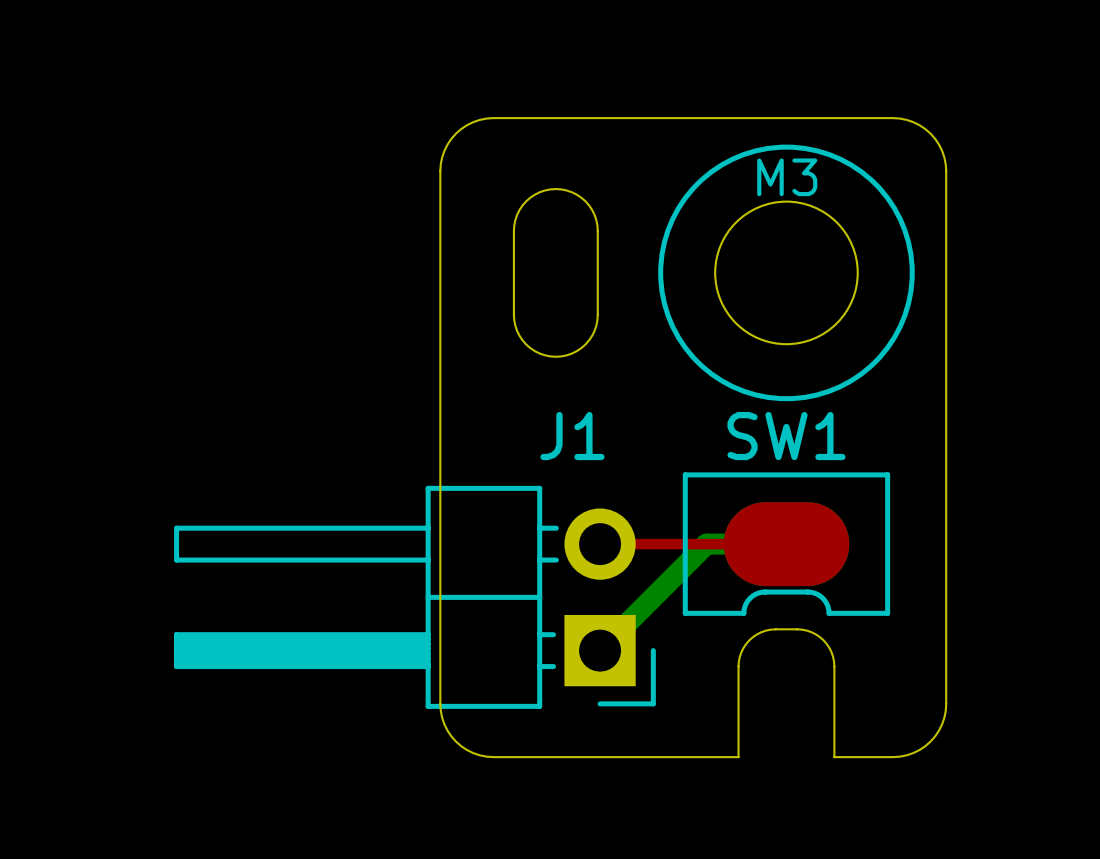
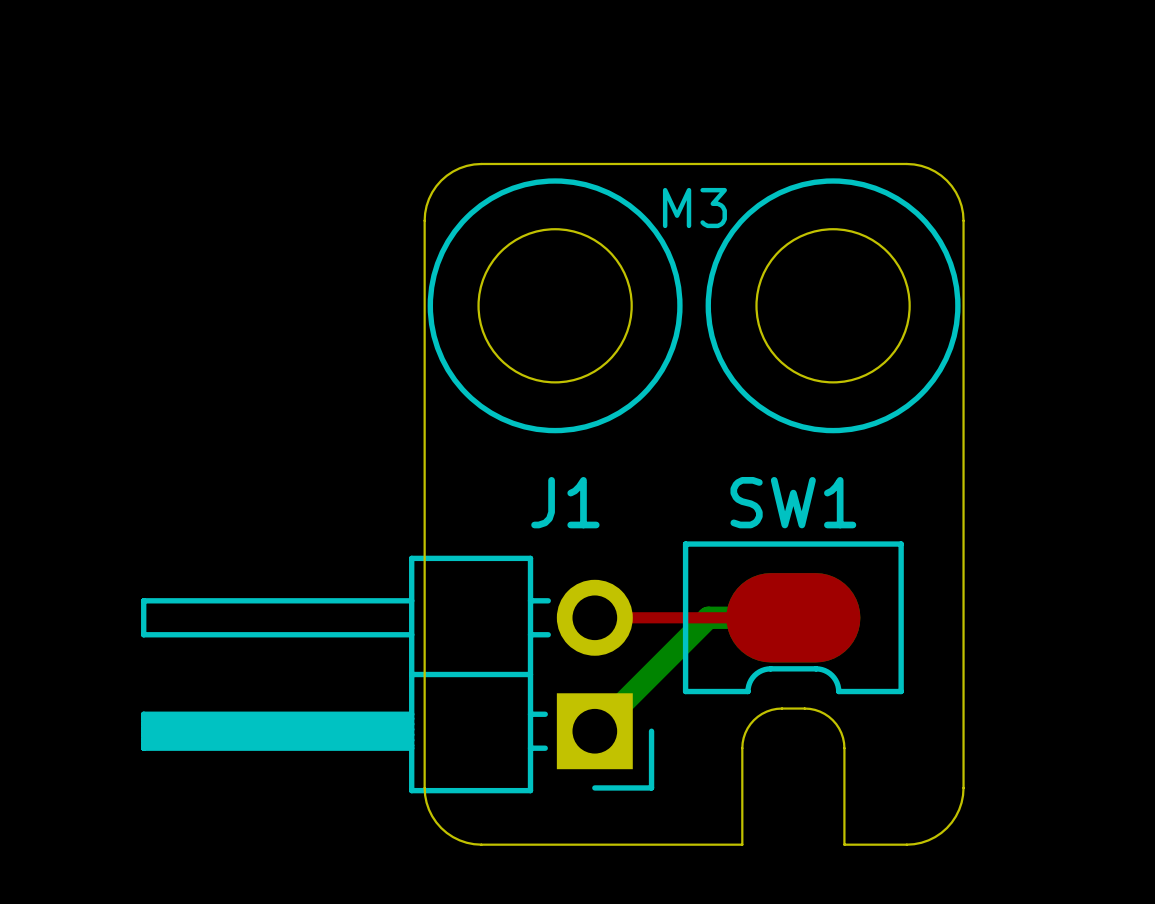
drawing: none -> [427, 178, 961, 434]
drawing: [658, 144, 915, 402] -> none
text position: M3 (787, 177) -> M3 (694, 208)
round board edge: none -> [477, 228, 633, 384]
round board edge: none -> [755, 228, 911, 384]
round board edge: [714, 200, 859, 346] -> none
board edge: (513, 230) (513, 314) (519, 335) (530, 348) (544, 355) (561, 356) (576, 351) (589, 340) (597, 320) (597, 230) (592, 210) (585, 201) (571, 192) (555, 189) (544, 190) (530, 197) (522, 205) (515, 220) (513, 230) -> none

